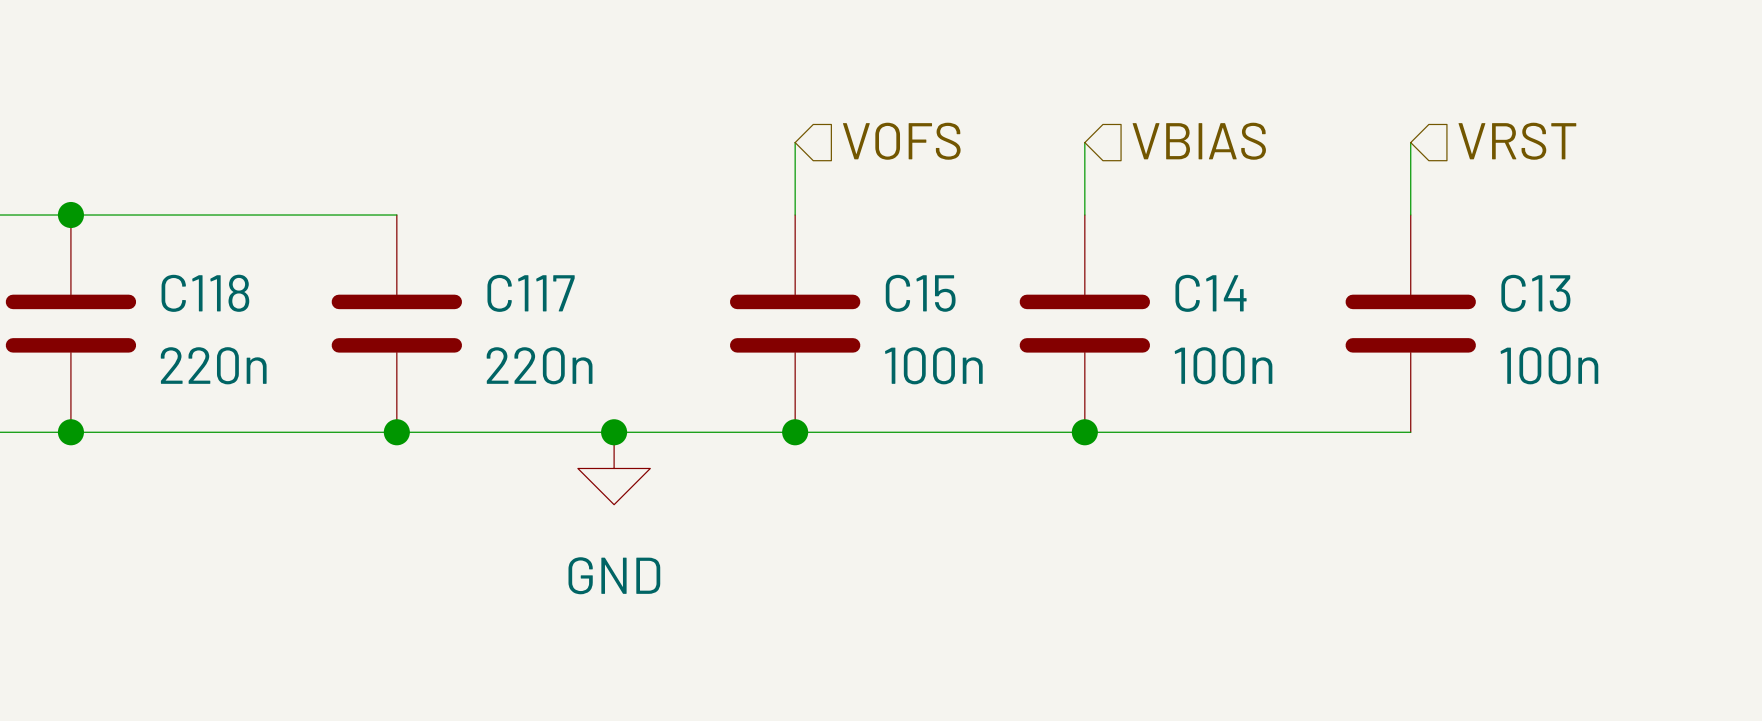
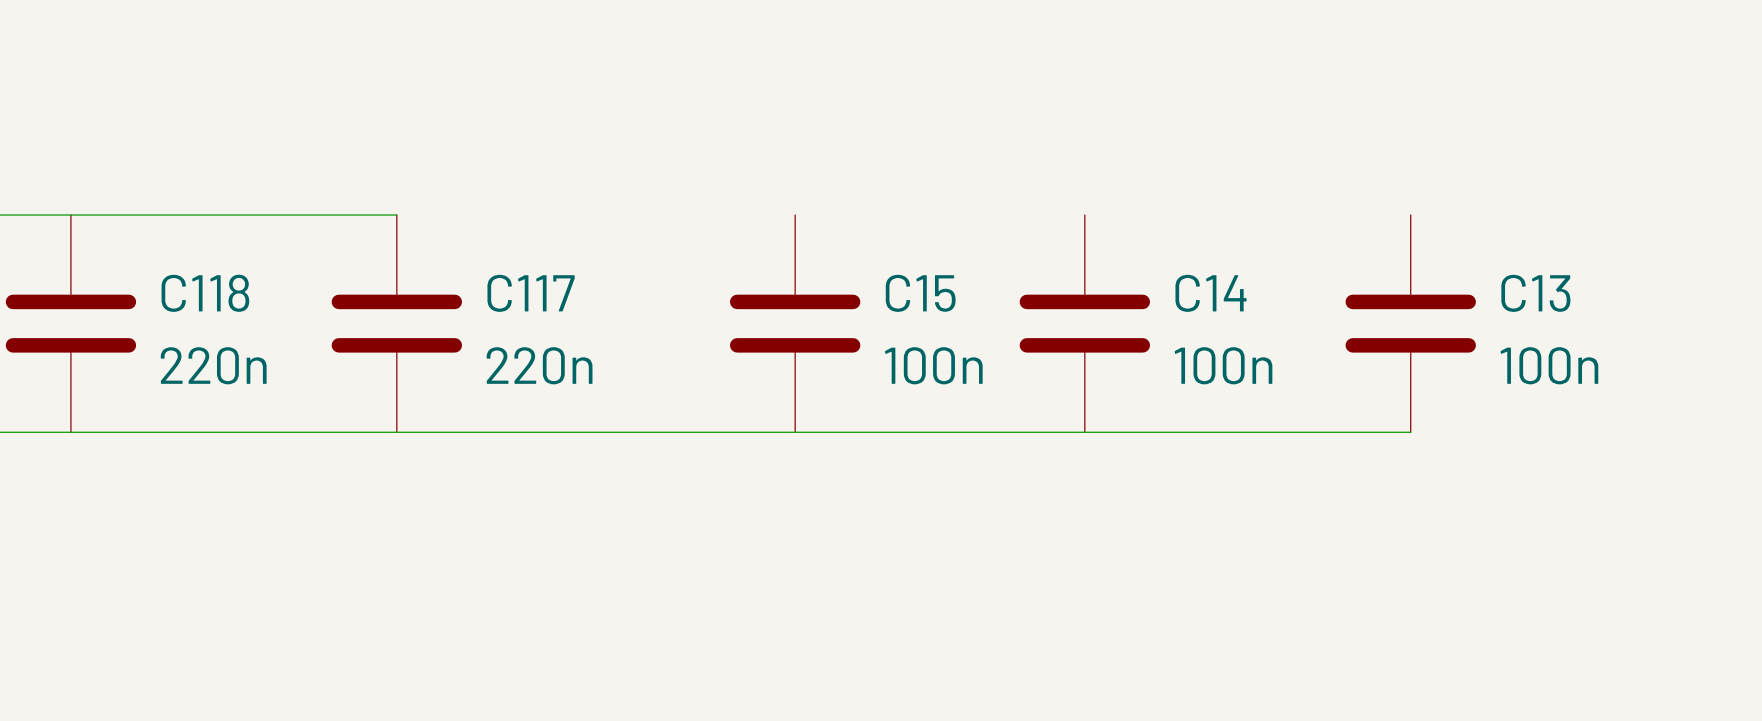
hierarchical label: VOFS (901, 141) -> none
hierarchical label: VBIAS (1199, 141) -> none
hierarchical label: VRST (1517, 141) -> none
wire: (795, 142) (795, 215) -> none
wire: (1084, 142) (1084, 215) -> none
wire: (1410, 142) (1410, 215) -> none
junction: (70, 215) -> none
junction: (70, 432) -> none
junction: (396, 432) -> none
junction: (614, 432) -> none
junction: (795, 432) -> none
junction: (1084, 432) -> none
power symbol: GND (614, 468) -> none

